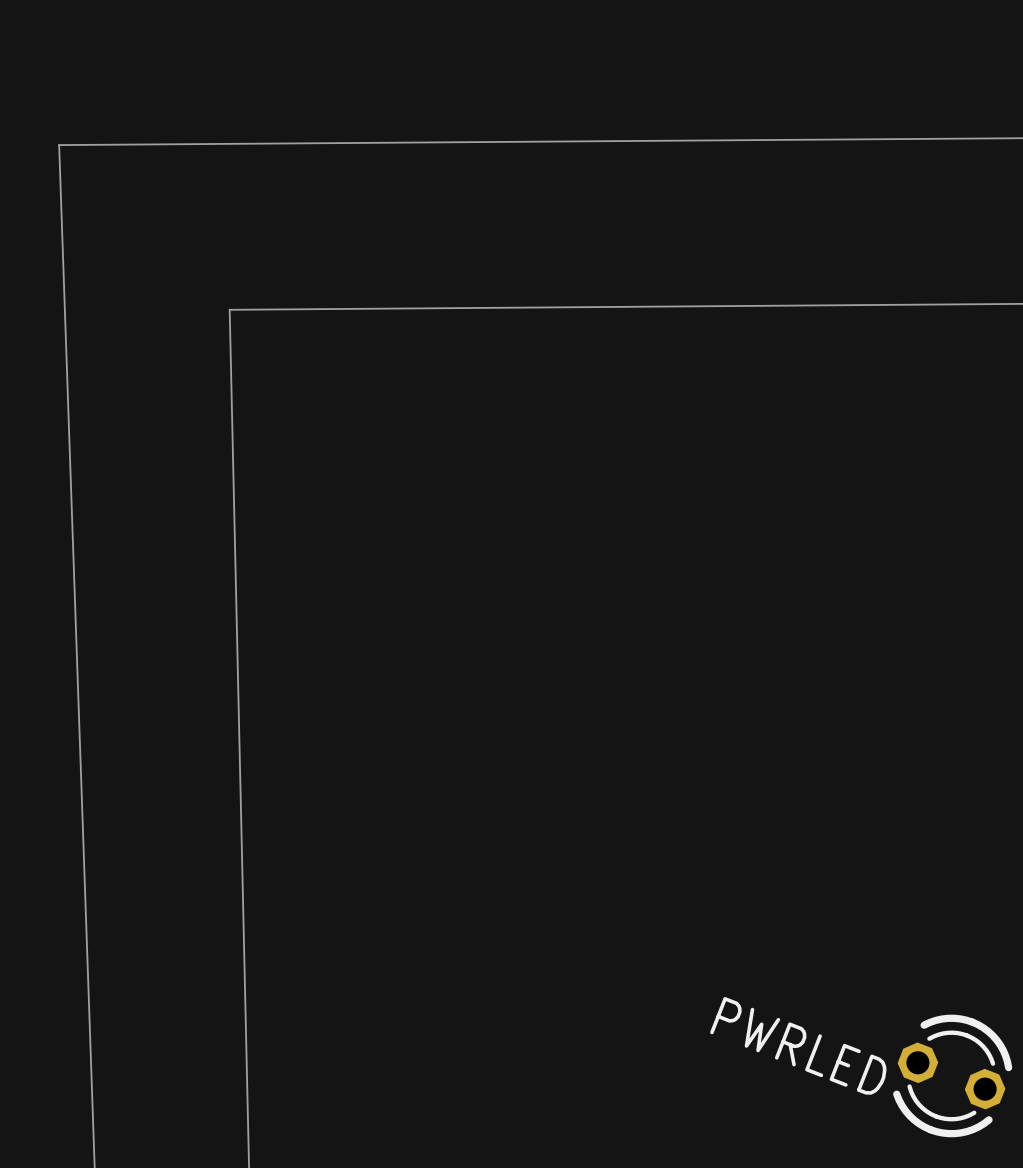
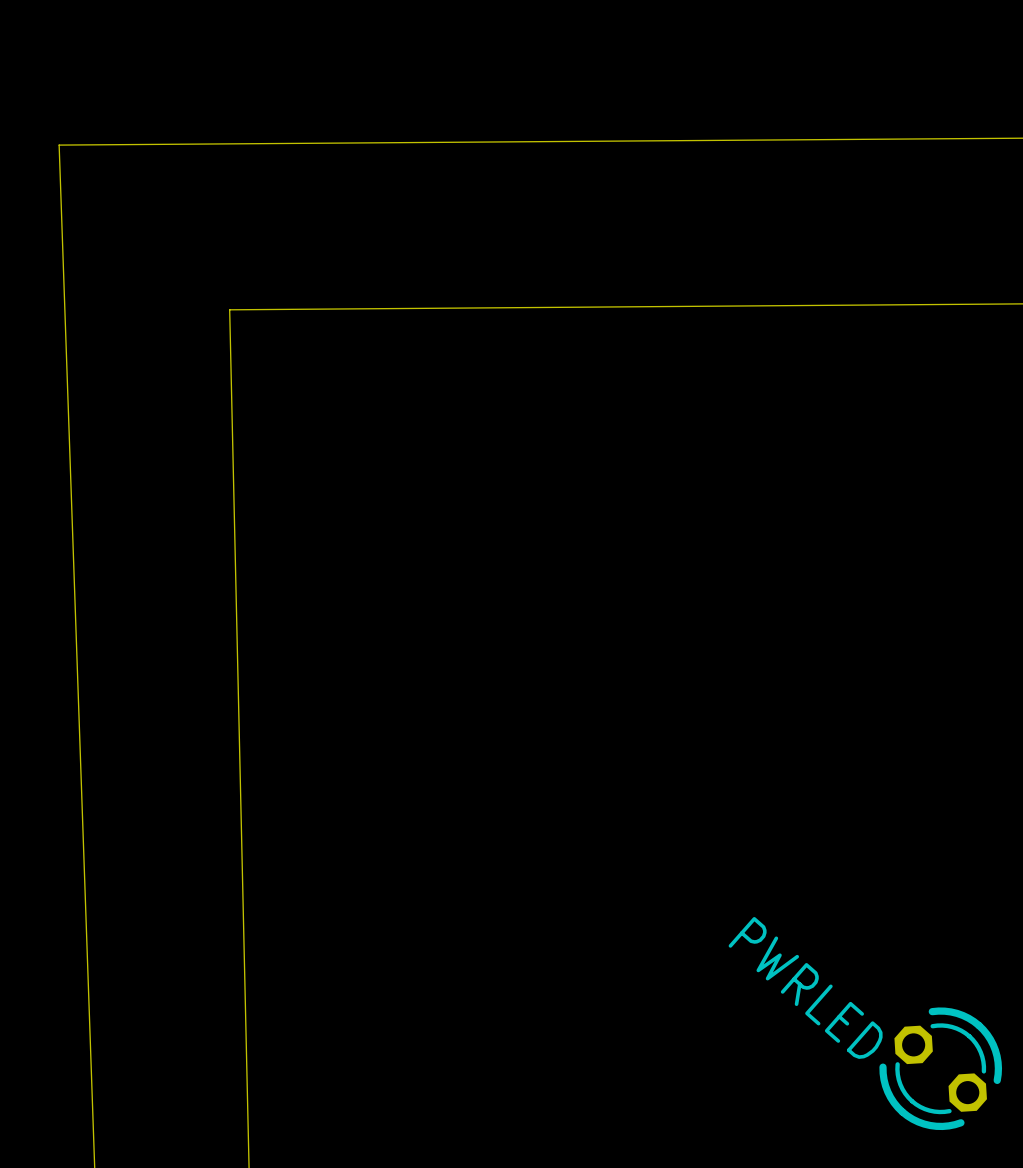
PWRLED rotation: 0° (952, 1075) -> 20° clockwise (940, 1068)

